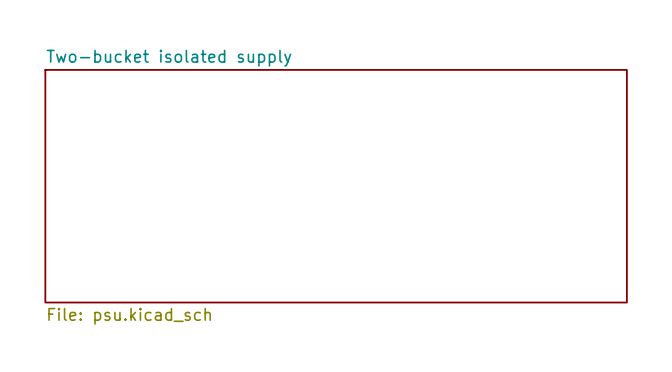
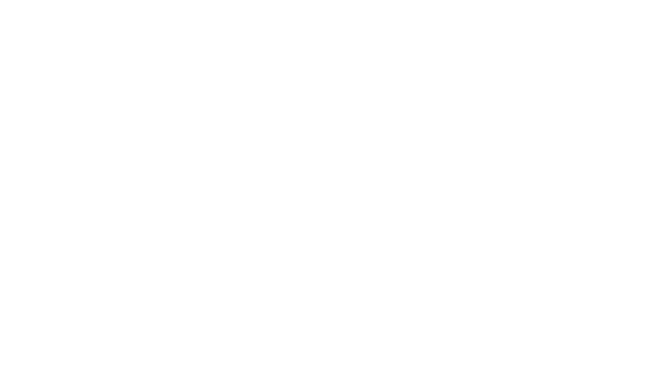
sheet Two-bucket isolated supply: File: psu.kicad_sch (336, 186) -> none

